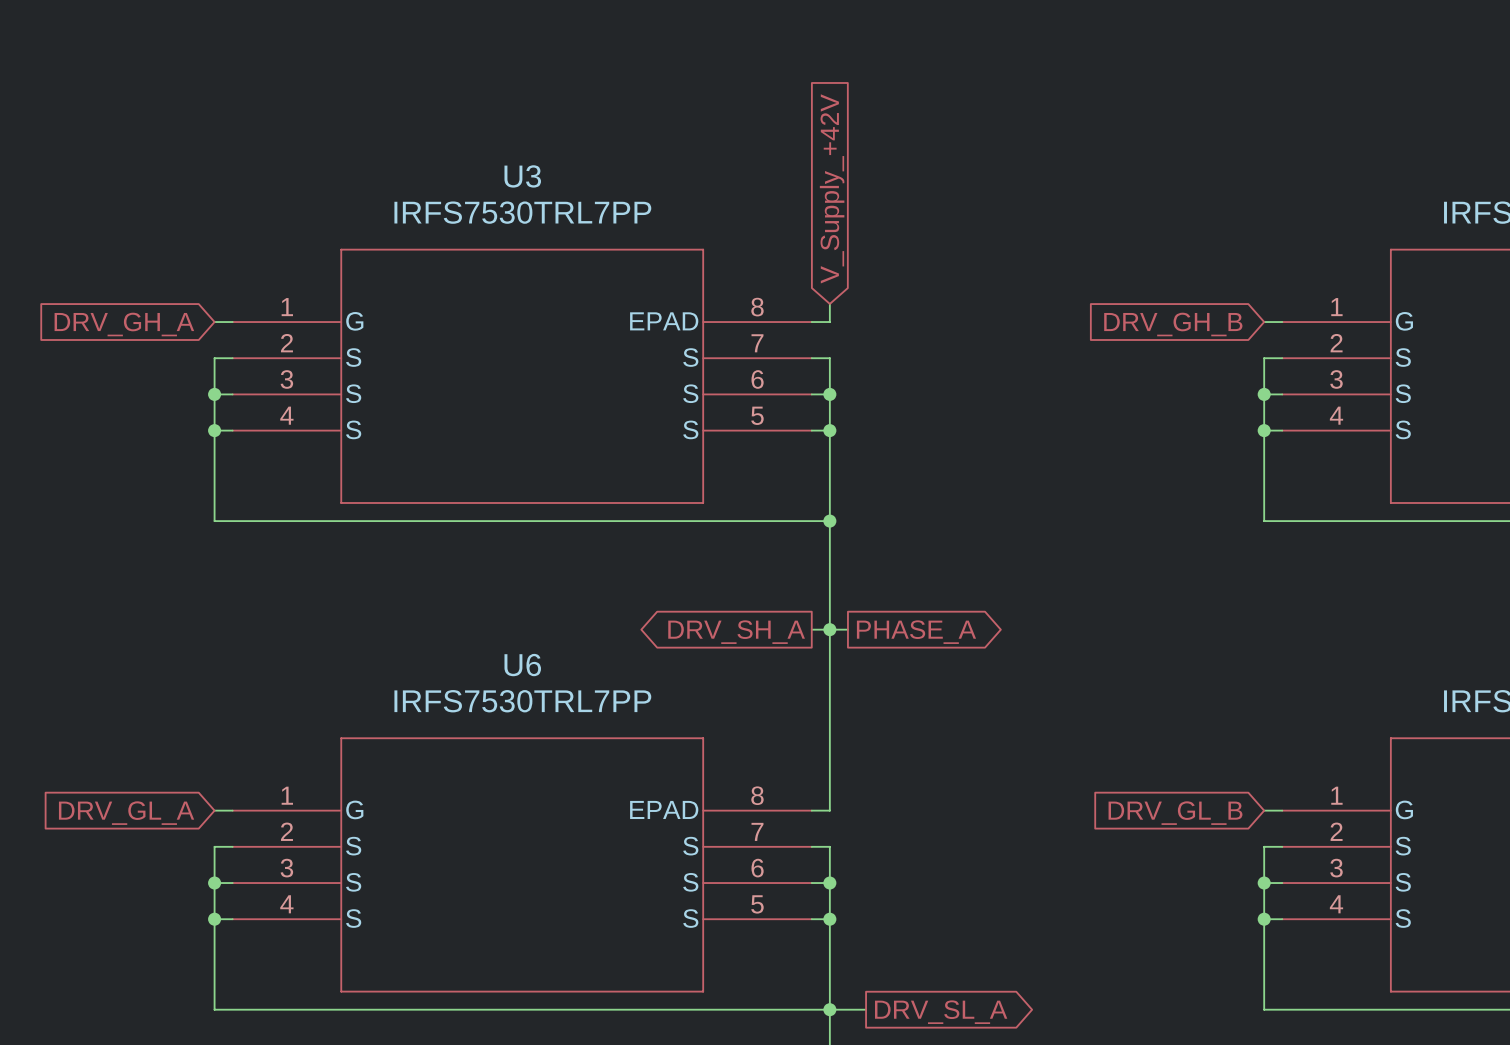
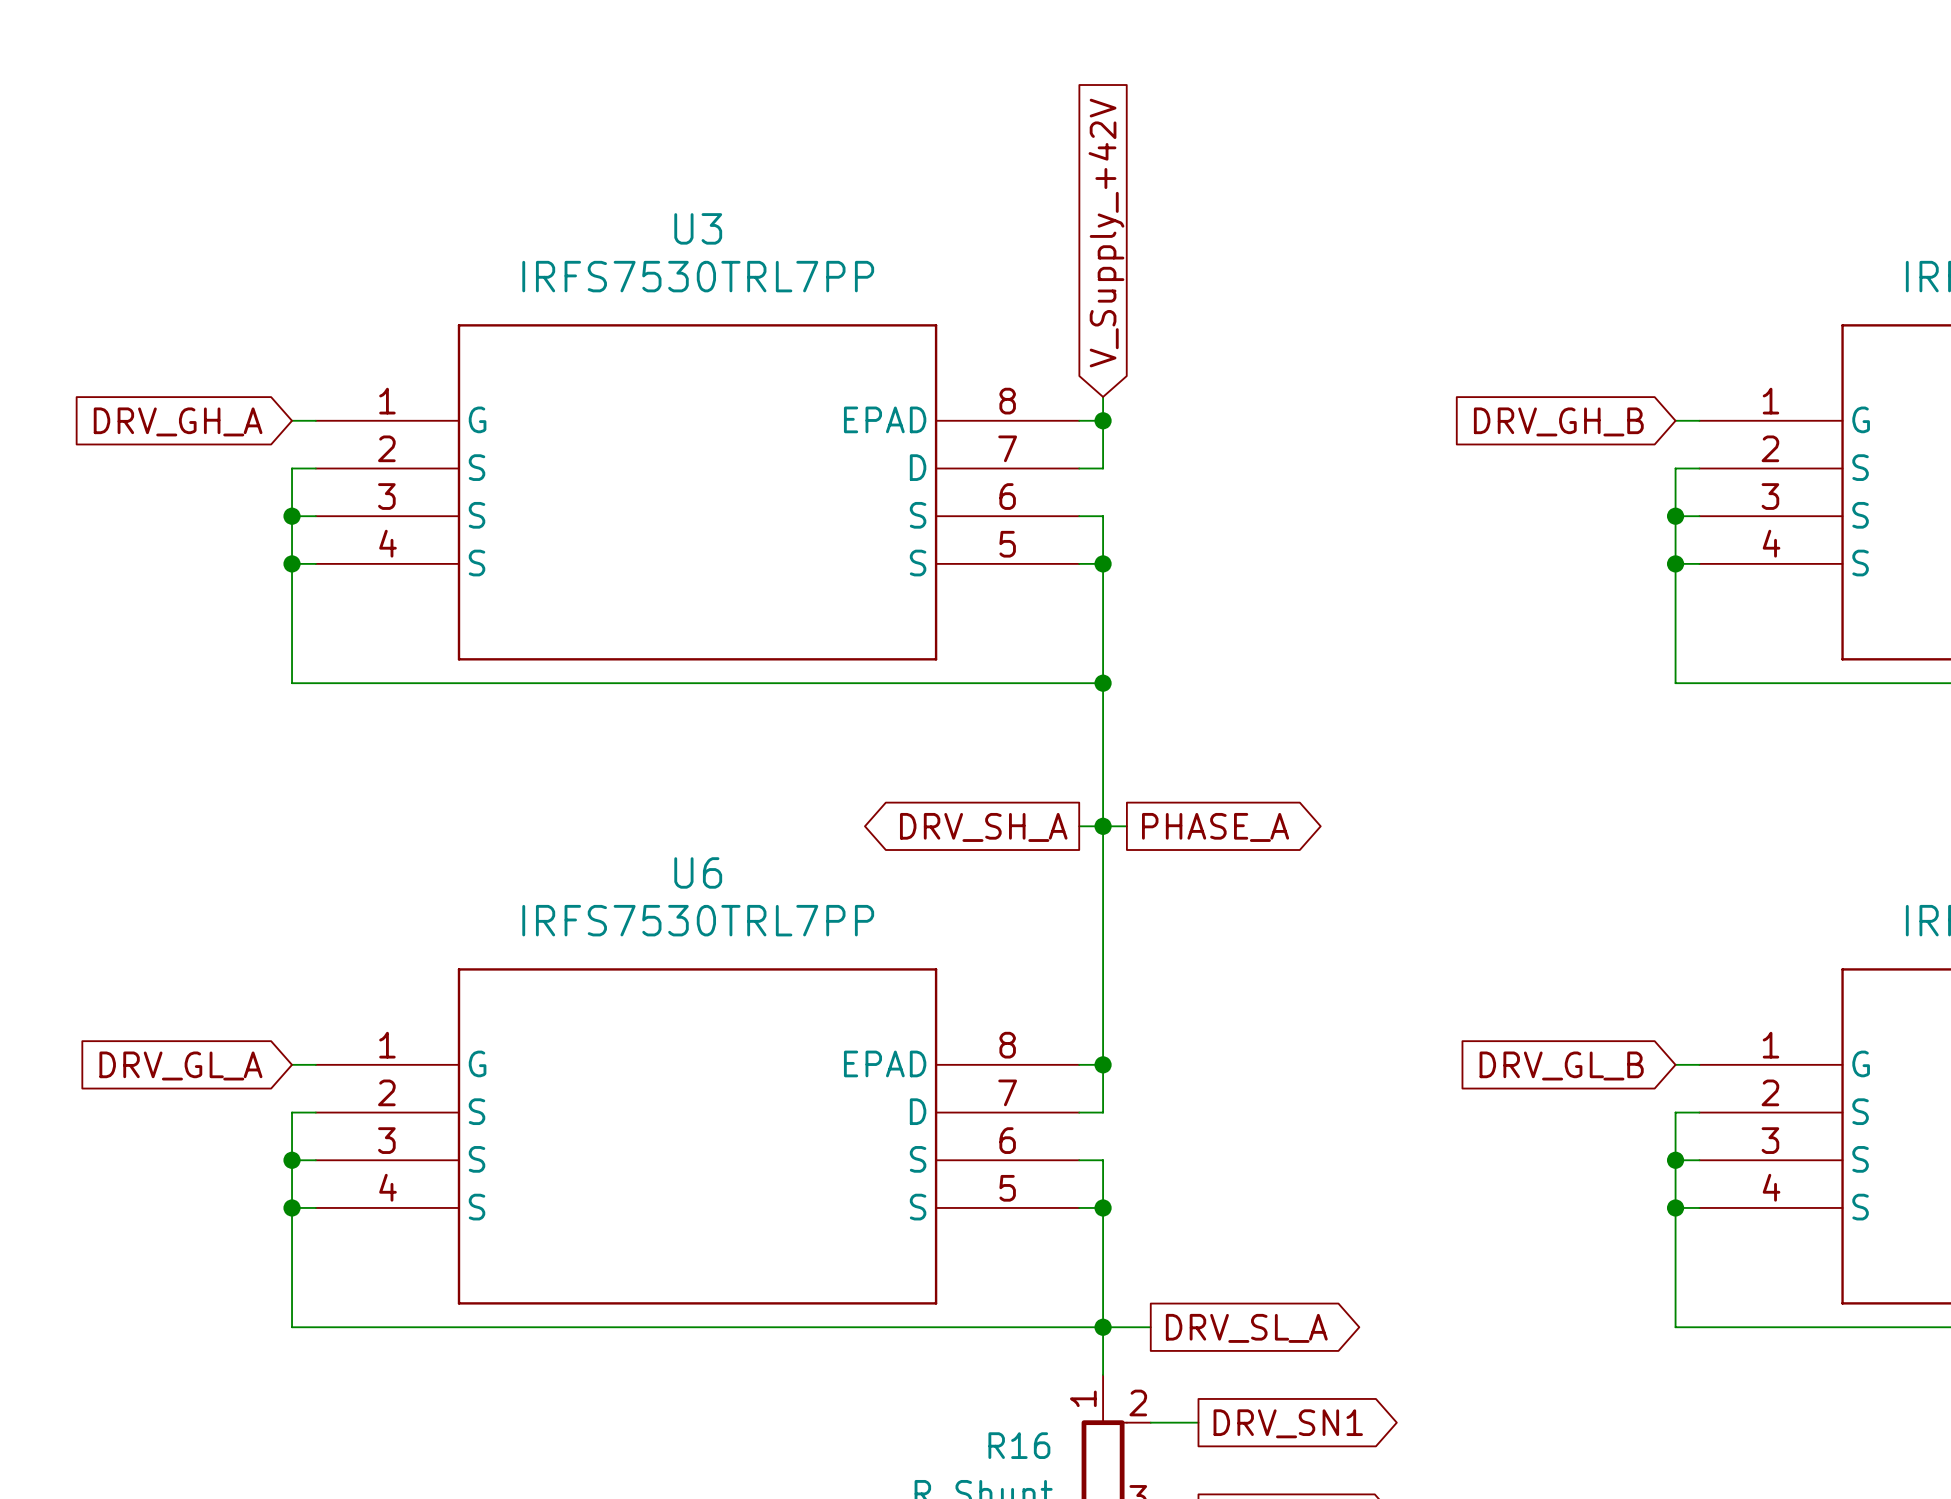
U3 pin name: S (690, 357) -> D (918, 467)
wire: (829, 358) (829, 394) -> (1103, 468) (1103, 420)
junction position: (829, 394) -> (1103, 420)
U6 pin name: S (690, 846) -> D (918, 1111)
wire: (829, 846) (829, 883) -> (1103, 1112) (1103, 1064)
junction position: (829, 883) -> (1103, 1064)

